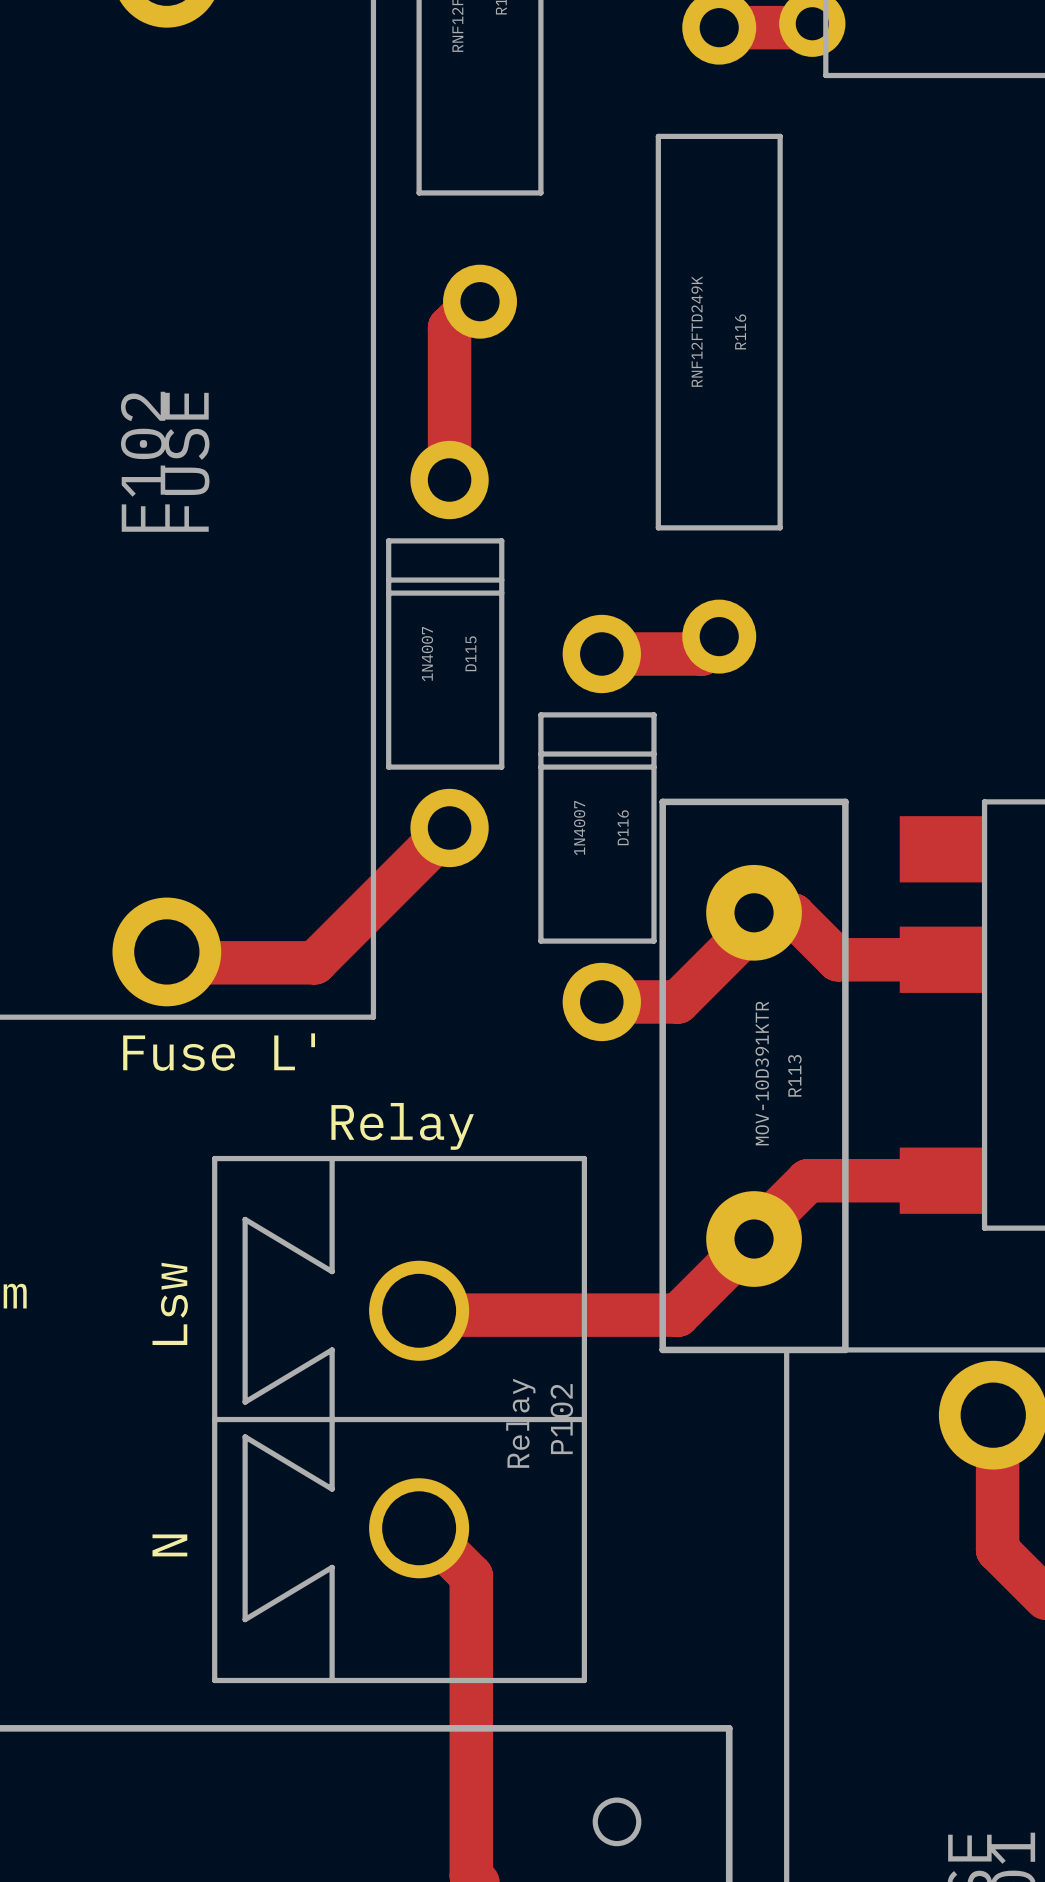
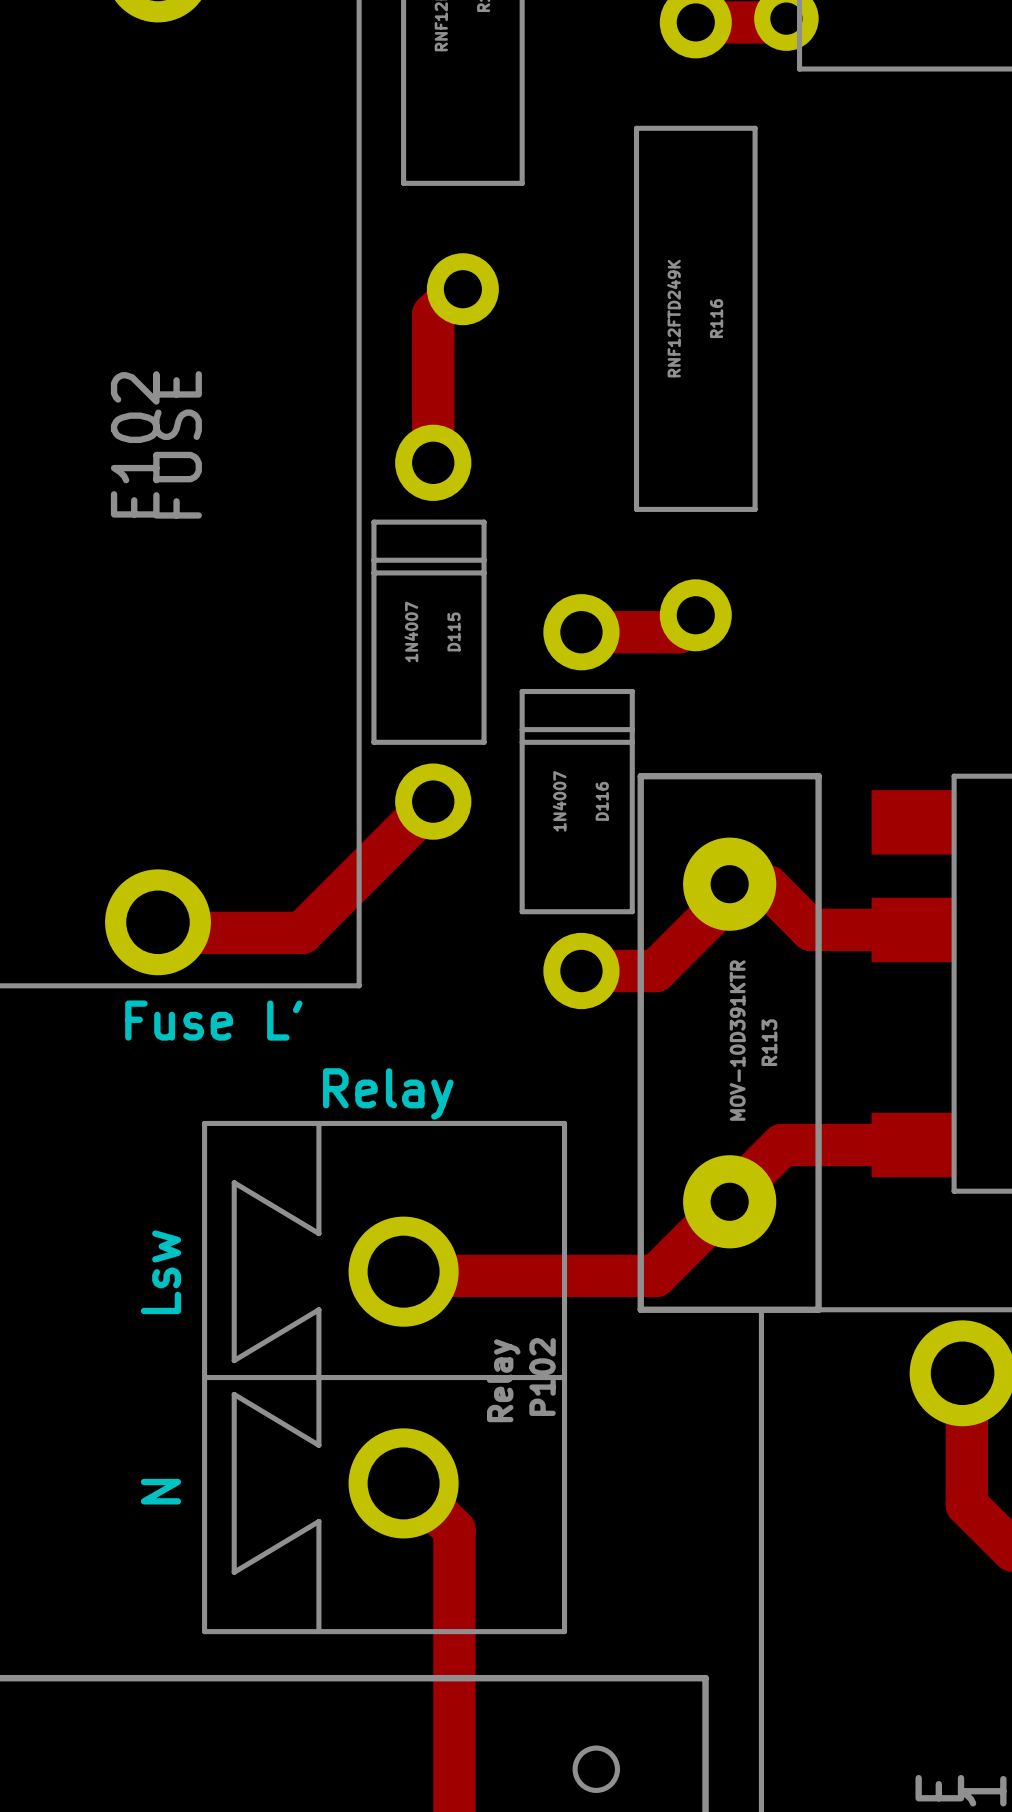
P102 footprint: [212, 1155, 588, 1684] -> [202, 1120, 568, 1635]

